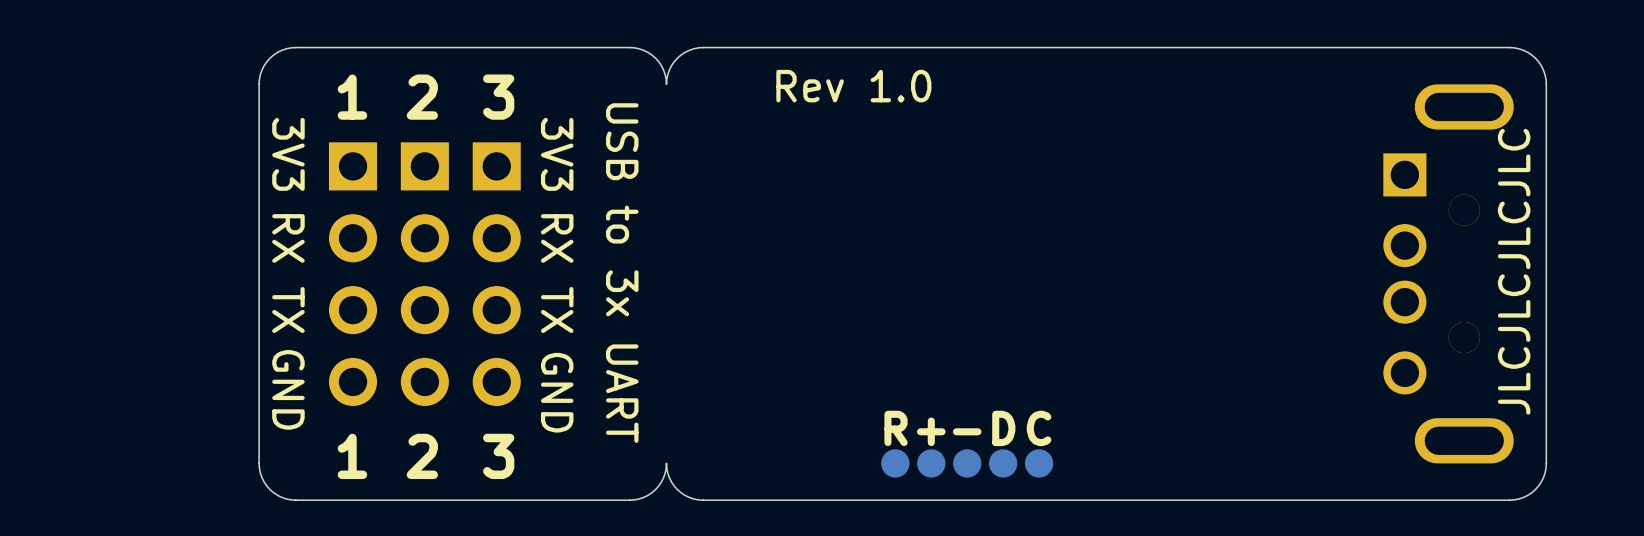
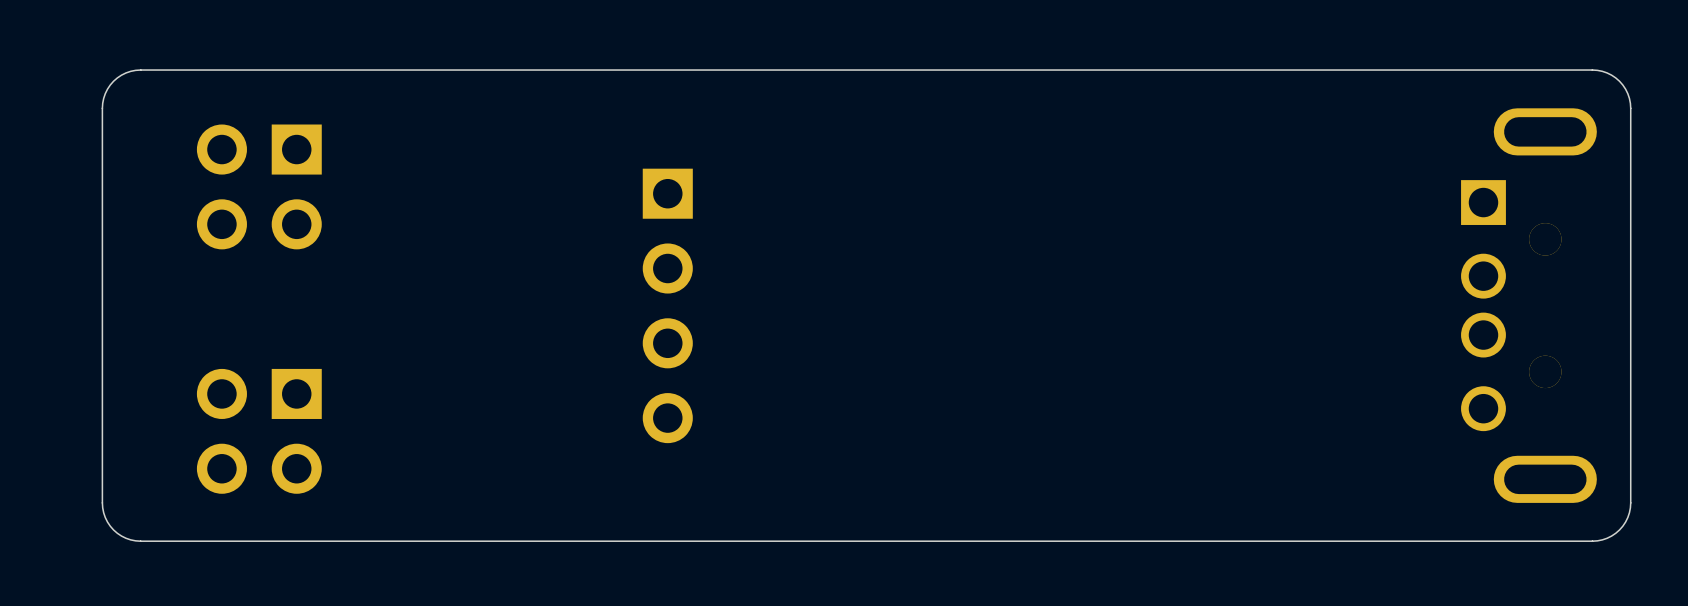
board edge: (295, 47) (281, 50) (269, 58) (261, 70) (259, 84) (259, 468) (264, 481) (273, 492) (286, 498) (295, 500) -> (329, 70) (135, 70) (121, 75) (113, 81) (105, 93) (102, 108) (102, 502) (107, 522) (117, 533) (135, 540) (329, 541)
board edge: (703, 47) (689, 50) (677, 58) (669, 70) (666, 84) (663, 70) (655, 58) (643, 50) (629, 47) -> (753, 70) (676, 70)
text: Rev 1.0 (853, 86) -> none
text: 1 (352, 97) -> none
text: 2 (422, 97) -> none
text: 3 (498, 97) -> none
text: 3V3 (288, 154) -> none
text: 3V3 (557, 154) -> none
part: none -> (259, 186)
text: RX (288, 238) -> none
text: RX (557, 238) -> none
text: JLCJLCJLCJLC (1514, 271) -> none
text: USB to 3x UART (622, 273) -> none
part: (353, 274) -> none
part: (424, 274) -> none
part: (496, 274) -> none
part: none -> (667, 305)
text: TX (288, 309) -> none
text: TX (557, 309) -> none
text: GND (288, 389) -> none
text: GND (557, 392) -> none
part: none -> (259, 431)
text: 1 (352, 456) -> none
text: 2 (422, 456) -> none
text: 3 (498, 456) -> none
part: (967, 463) -> none
board edge: (703, 500) (689, 497) (677, 489) (669, 477) (666, 463) (663, 477) (655, 489) (643, 497) (629, 500) -> (753, 541) (676, 541)

